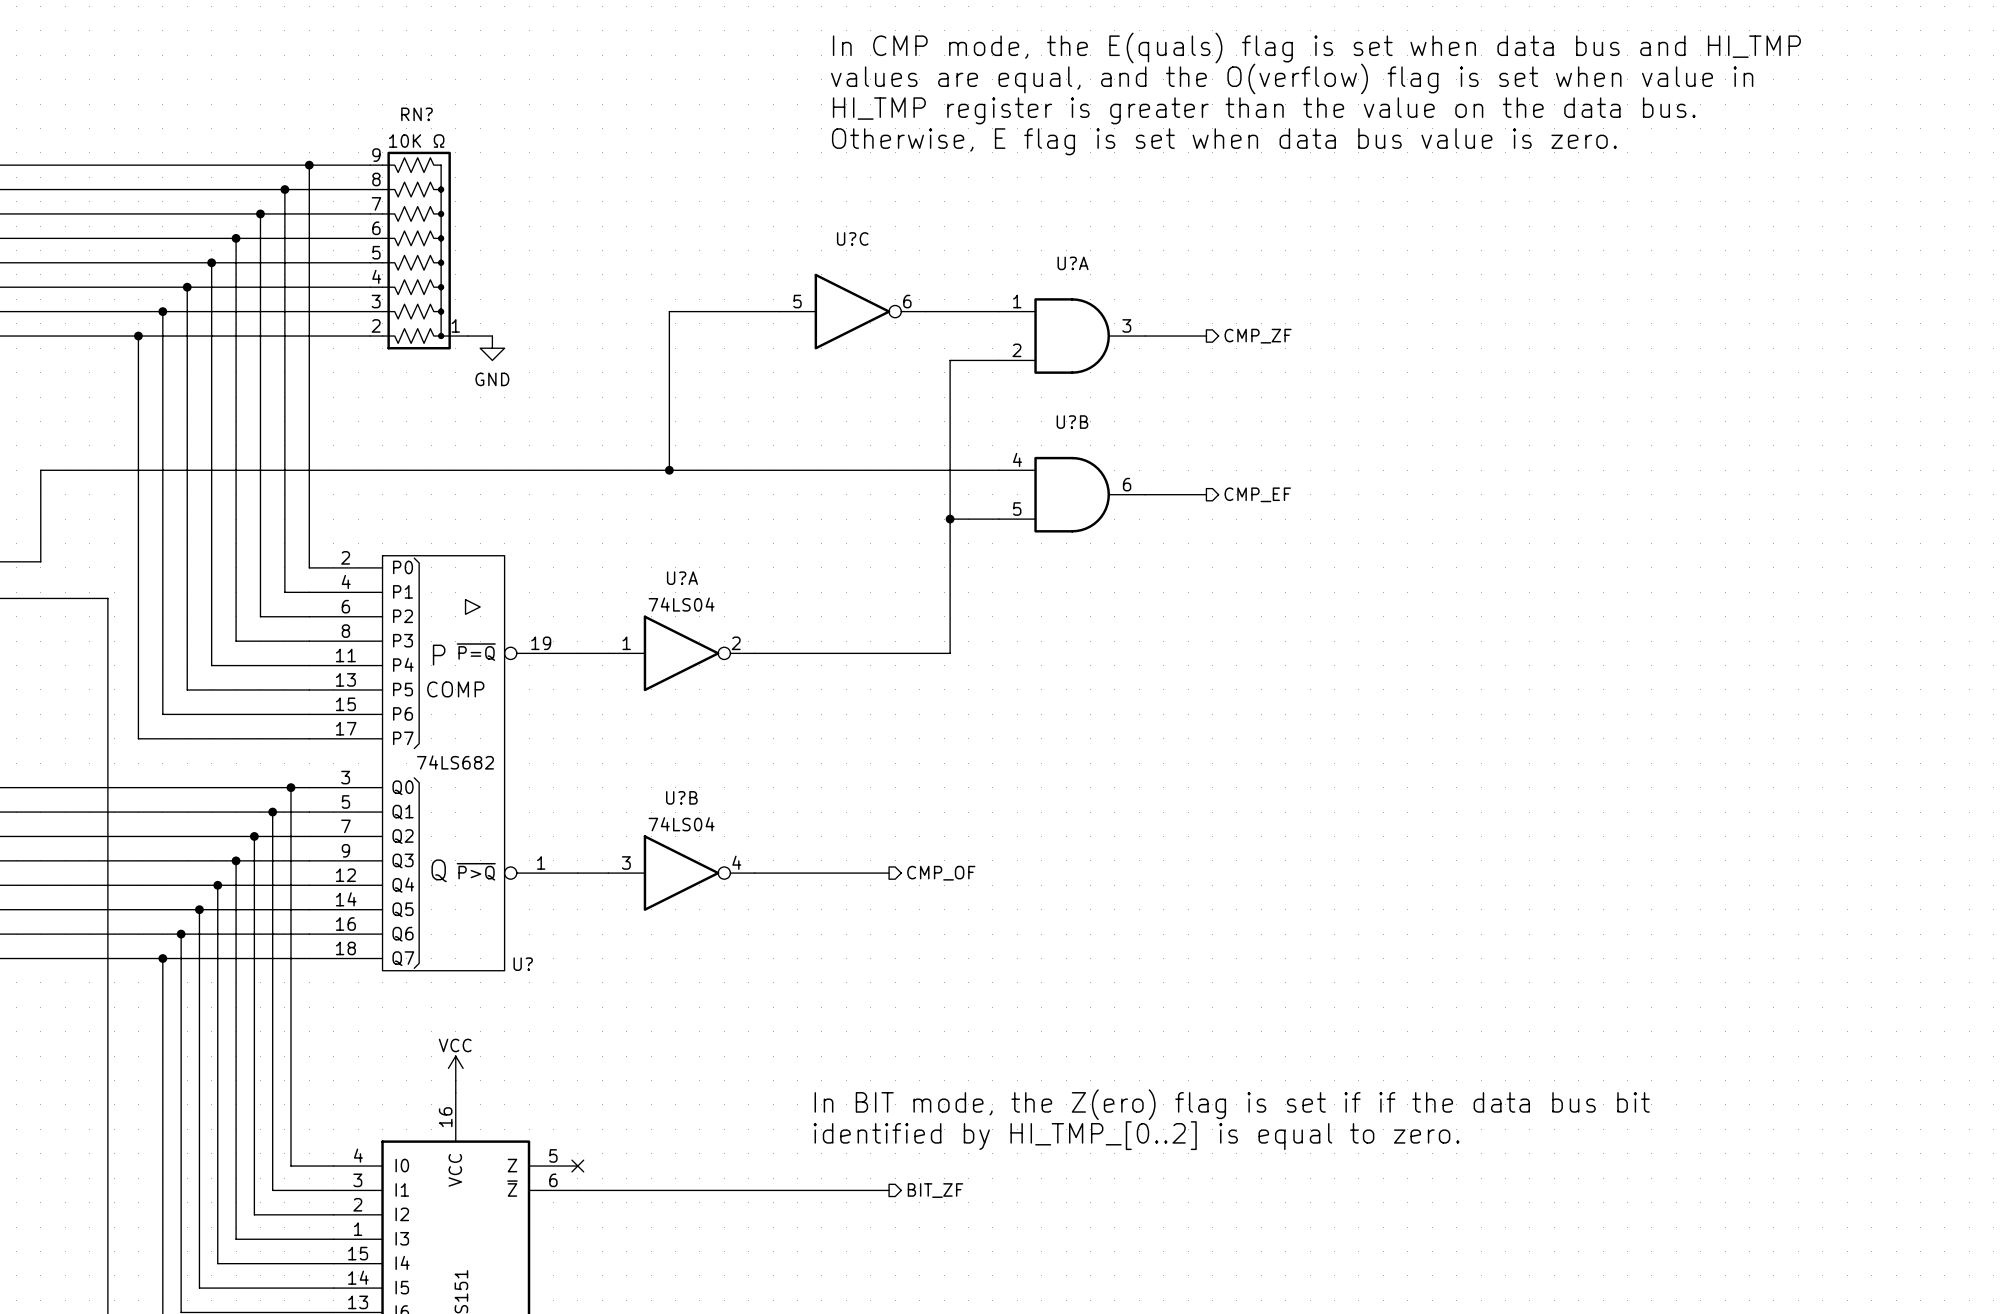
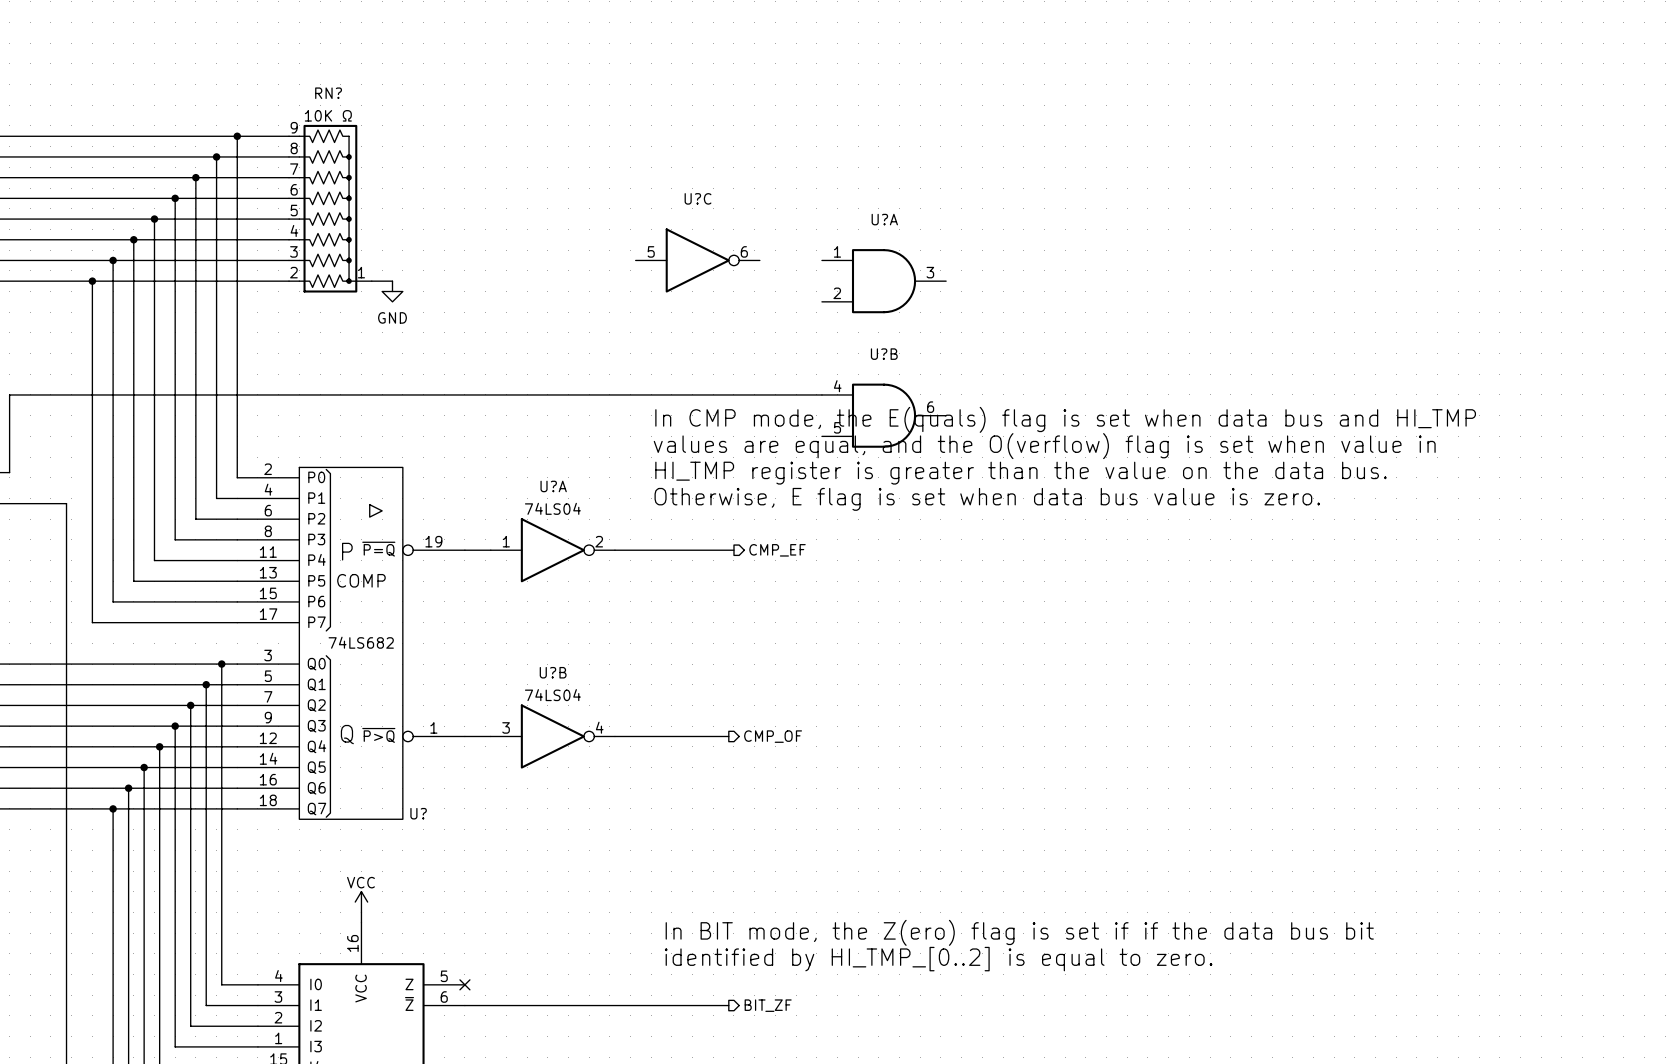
text: In CMP mode, the E(quals) flag is set when data bus and HI_TMP (1316, 48) -> none
text: values are equal, and the O(verflow) flag is set when value in (1292, 78) -> none
text: HI_TMP register is greater than the value on the data bus. (1264, 110) -> none
text: Otherwise, E flag is set when data bus value is zero. (1224, 141) -> none
wire: (779, 311) (669, 311) (669, 470) -> none
wire: (925, 311) (998, 311) -> none
wire: (1145, 336) (1206, 336) -> none
hierarchical label: CMP_ZF (1258, 336) -> none
wire: (998, 360) (950, 360) (950, 653) (895, 653) -> none
junction: (669, 470) -> none
wire: (1145, 494) (1206, 494) -> none
hierarchical label: CMP_EF (1257, 494) -> none
text: none -> In CMP mode, the E(quals) flag is set when data bus and HI_TMP (1065, 419)
wire: (950, 519) (998, 519) -> none
junction: (950, 519) -> none
text: none -> values are equal, and the O(verflow) flag is set when value in (1044, 446)
text: none -> HI_TMP register is greater than the value on the data bus. (1021, 473)
text: none -> Otherwise, E flag is set when data bus value is zero. (987, 499)
hierarchical label: none -> CMP_EF (777, 550)

